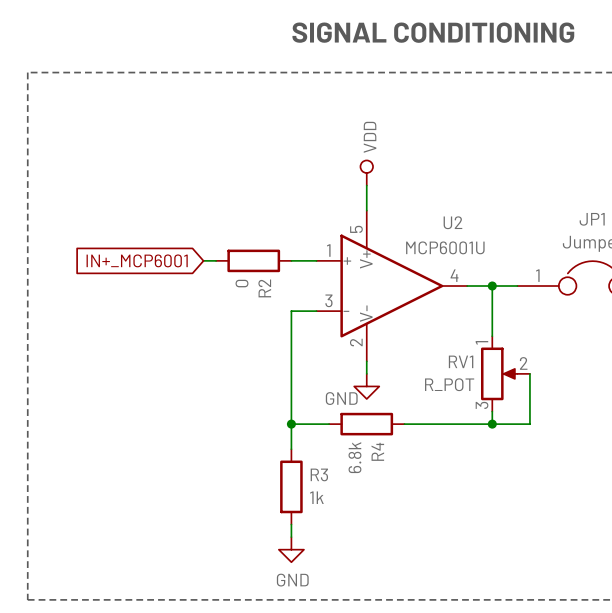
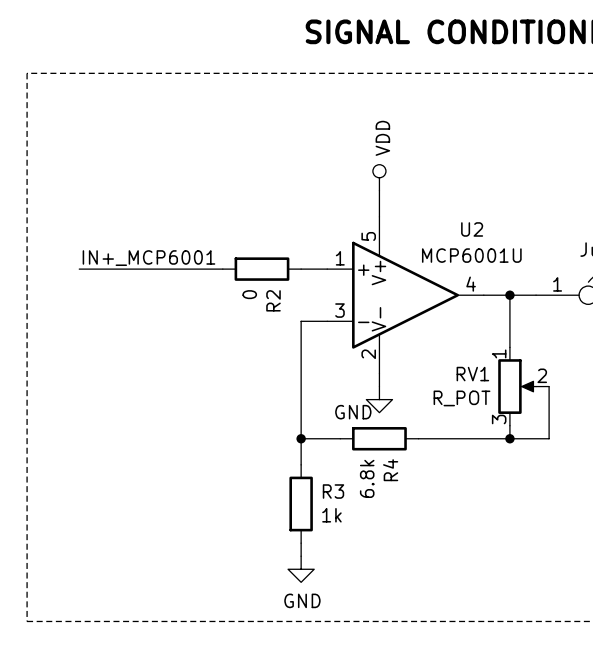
label: none -> IN+_MCP6001 (148, 258)
wire: none -> (79, 269) (209, 269)
global label: IN+_MCP6001 (137, 260) -> none

